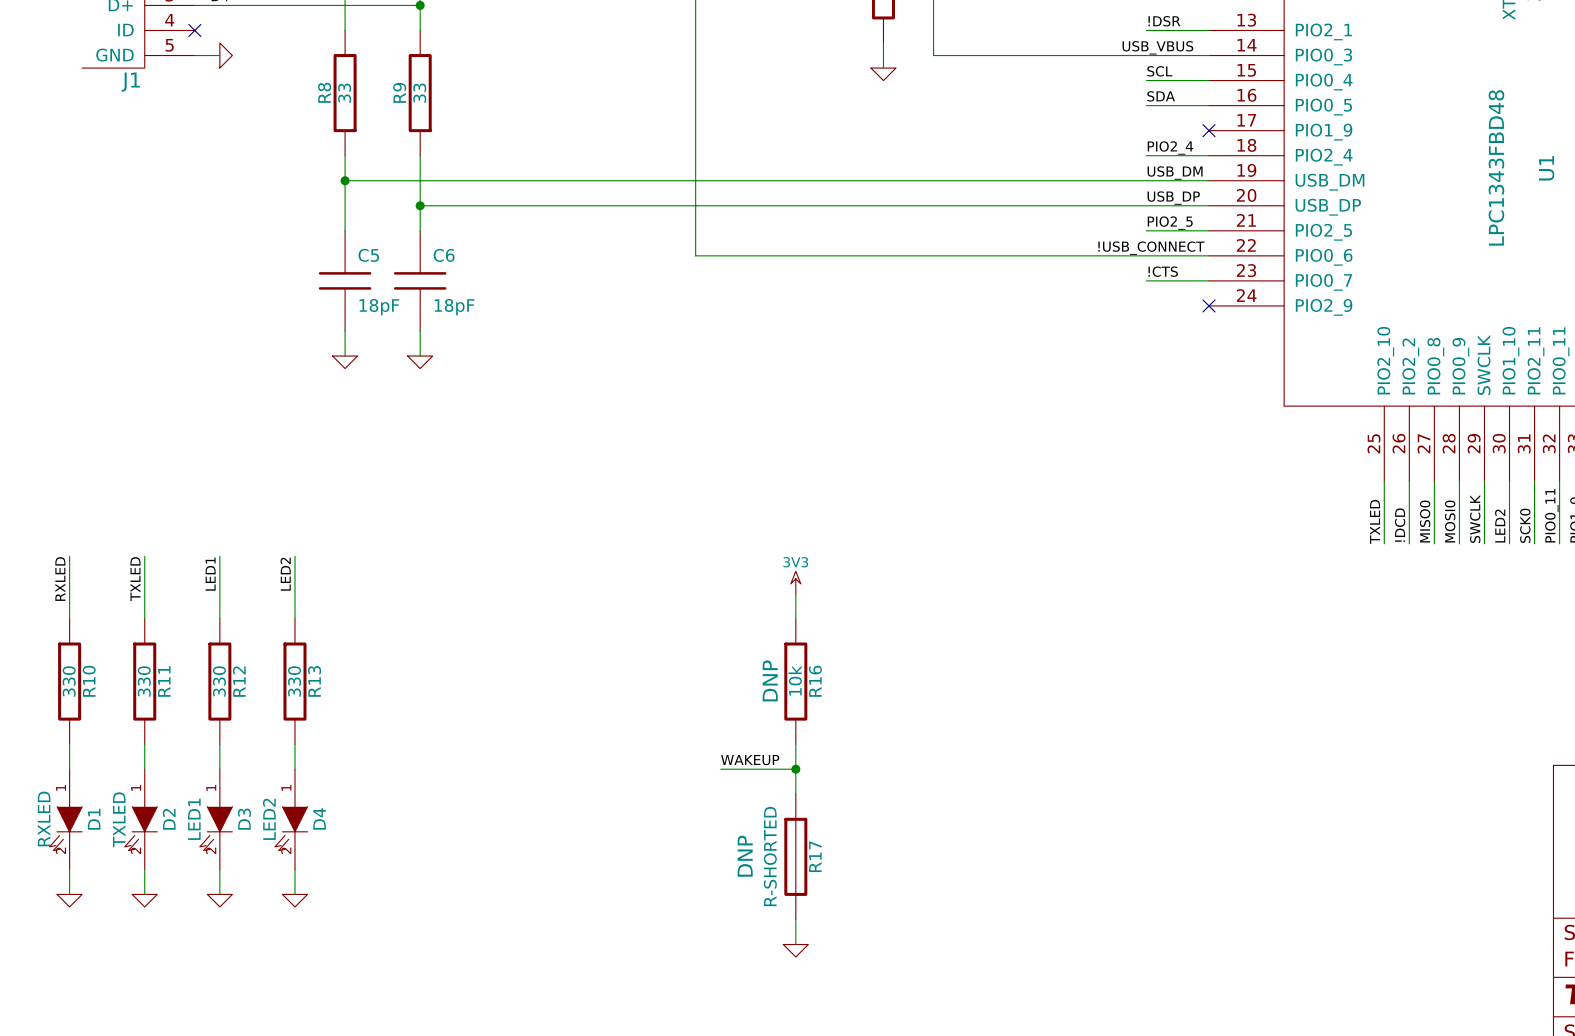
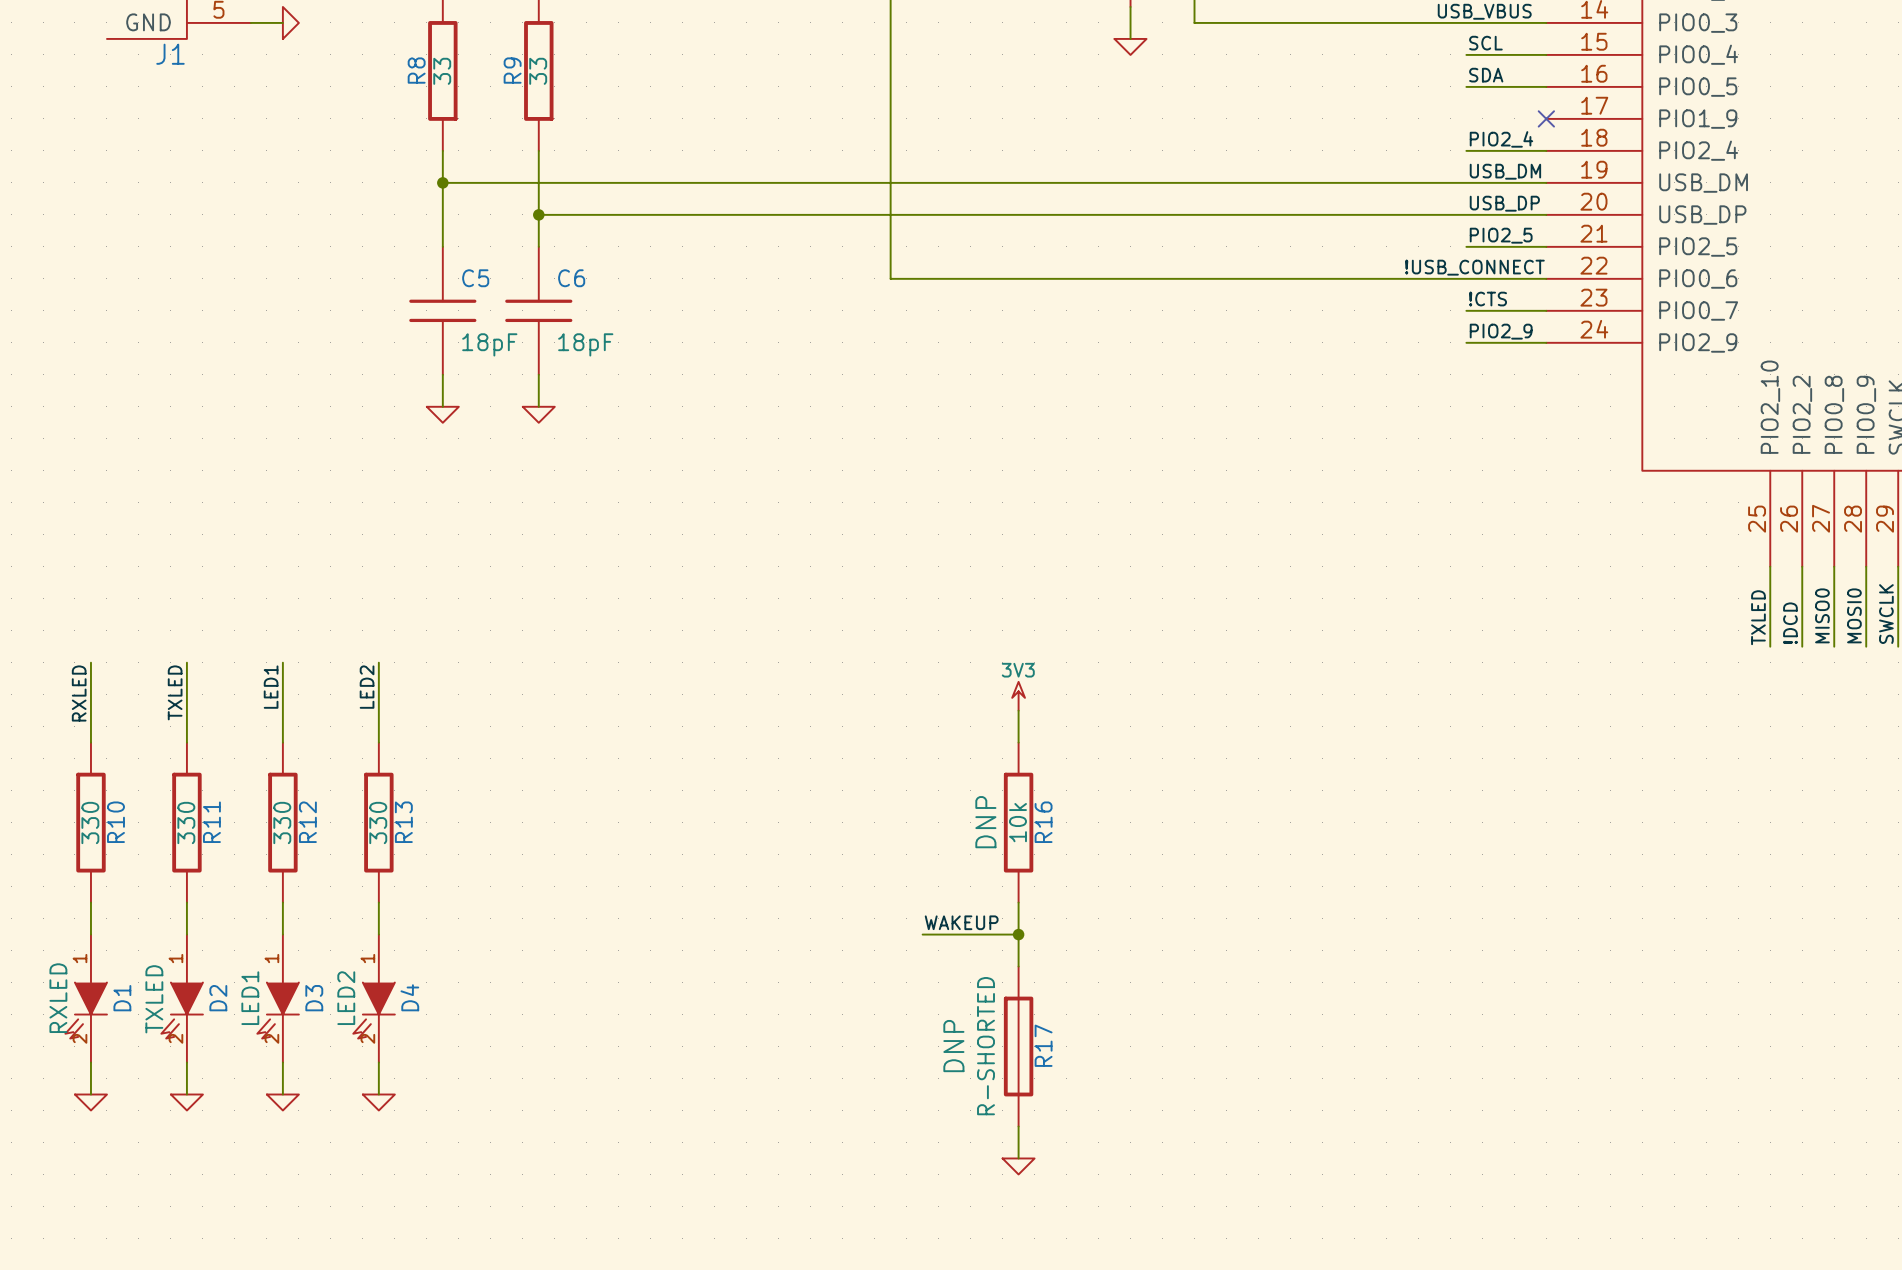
label: none -> PIO2_9 (1501, 331)
wire: none -> (1466, 342) (1546, 342)
no-connect mark: (1209, 305) -> none

